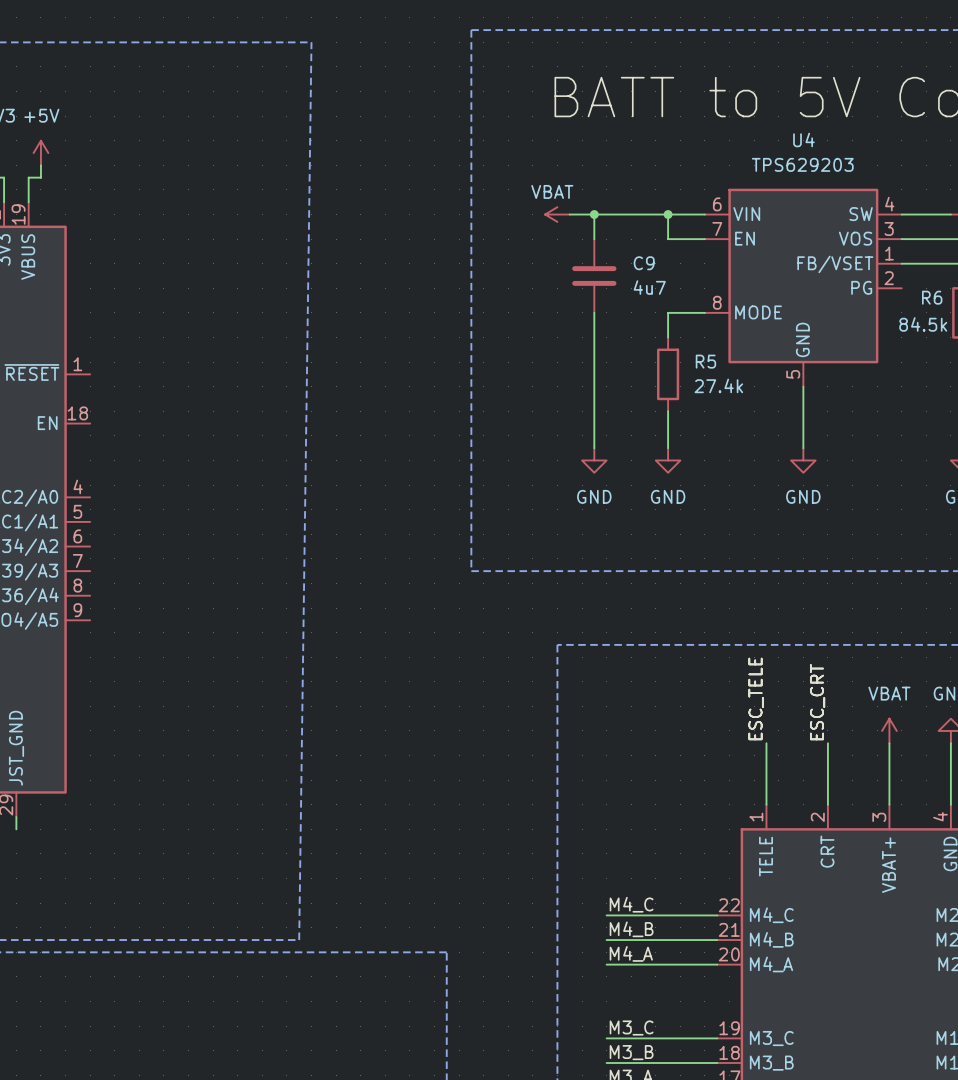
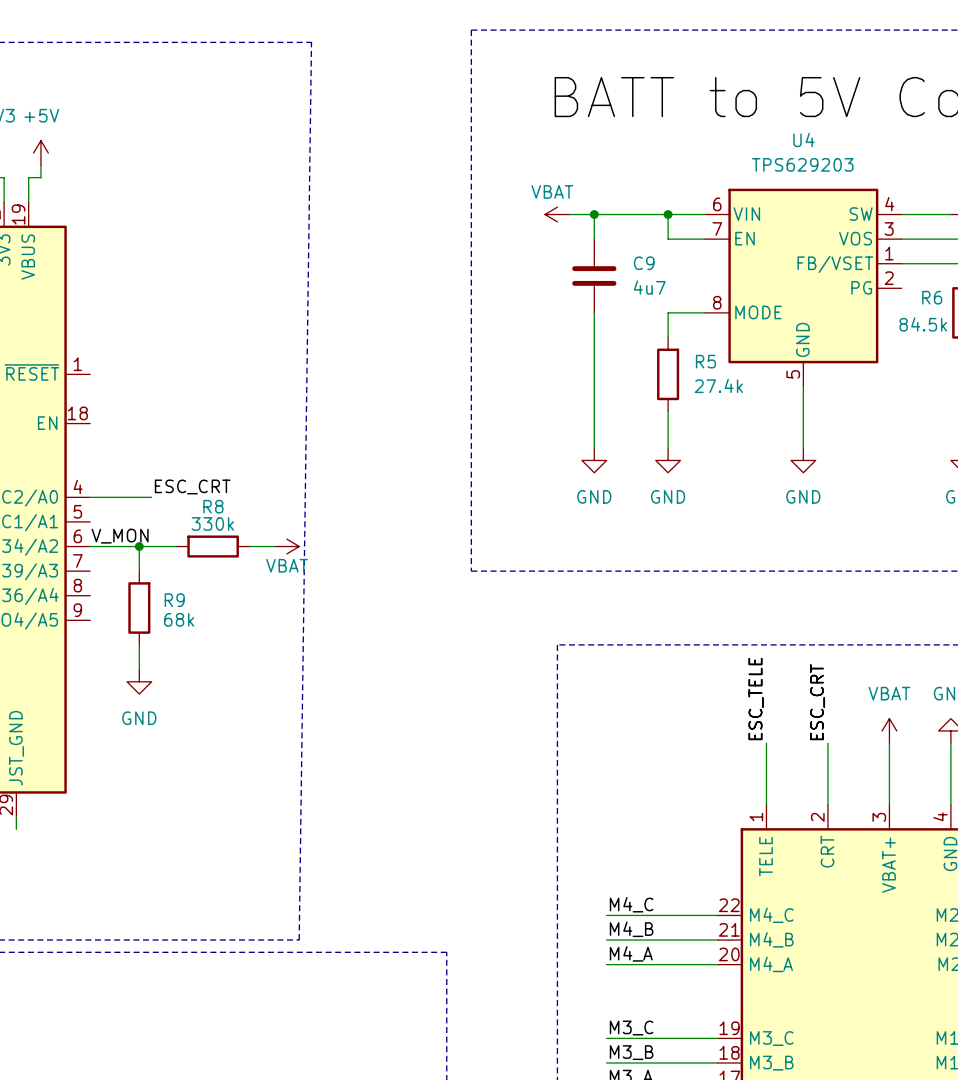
label: none -> ESC_CRT (192, 486)
wire: none -> (90, 497) (151, 497)
label: none -> V_MON (120, 536)
wire: none -> (90, 546) (176, 546)
wire: none -> (139, 546) (139, 571)
junction: none -> (139, 546)
R8: none -> 330k (213, 546)
wire: none -> (250, 546) (274, 546)
power symbol: none -> VBAT (286, 546)
R9: none -> 68k (139, 608)
wire: none -> (139, 644) (139, 669)
power symbol: none -> GND (139, 681)

